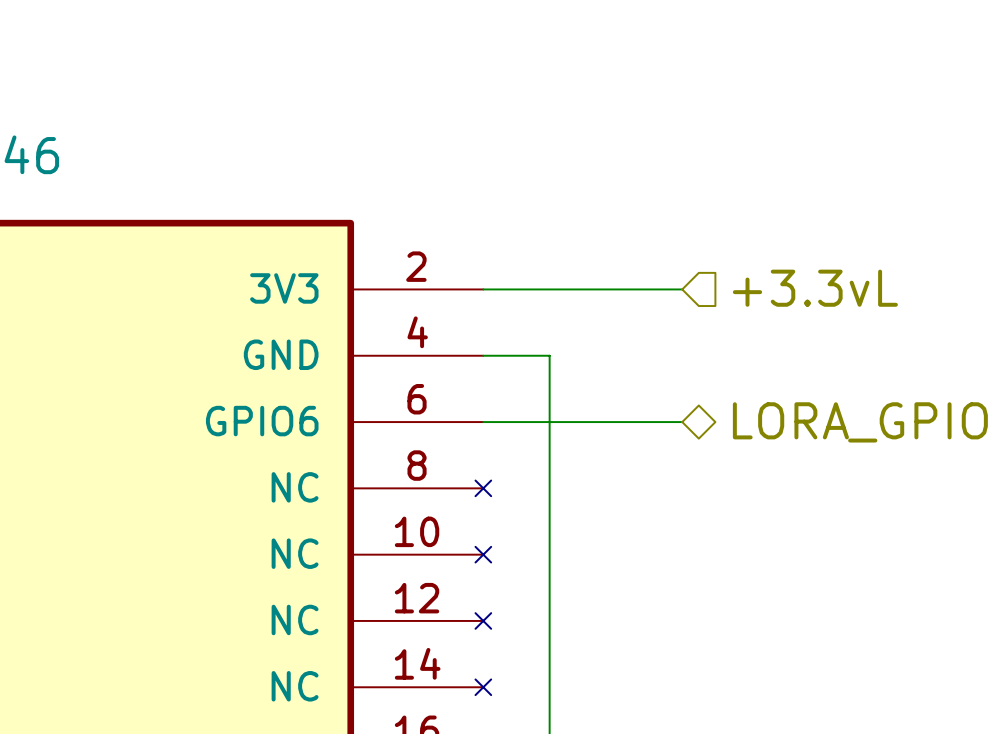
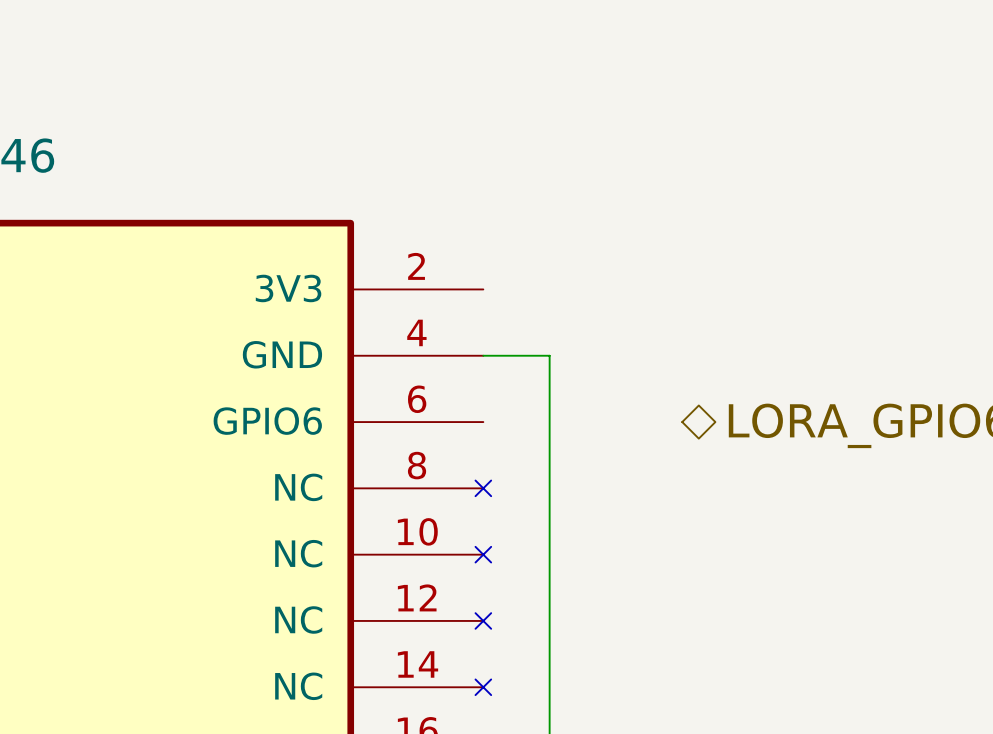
hierarchical label: +3.3vL (815, 288) -> none
wire: (483, 289) (682, 289) -> none
wire: (483, 422) (682, 422) -> none

